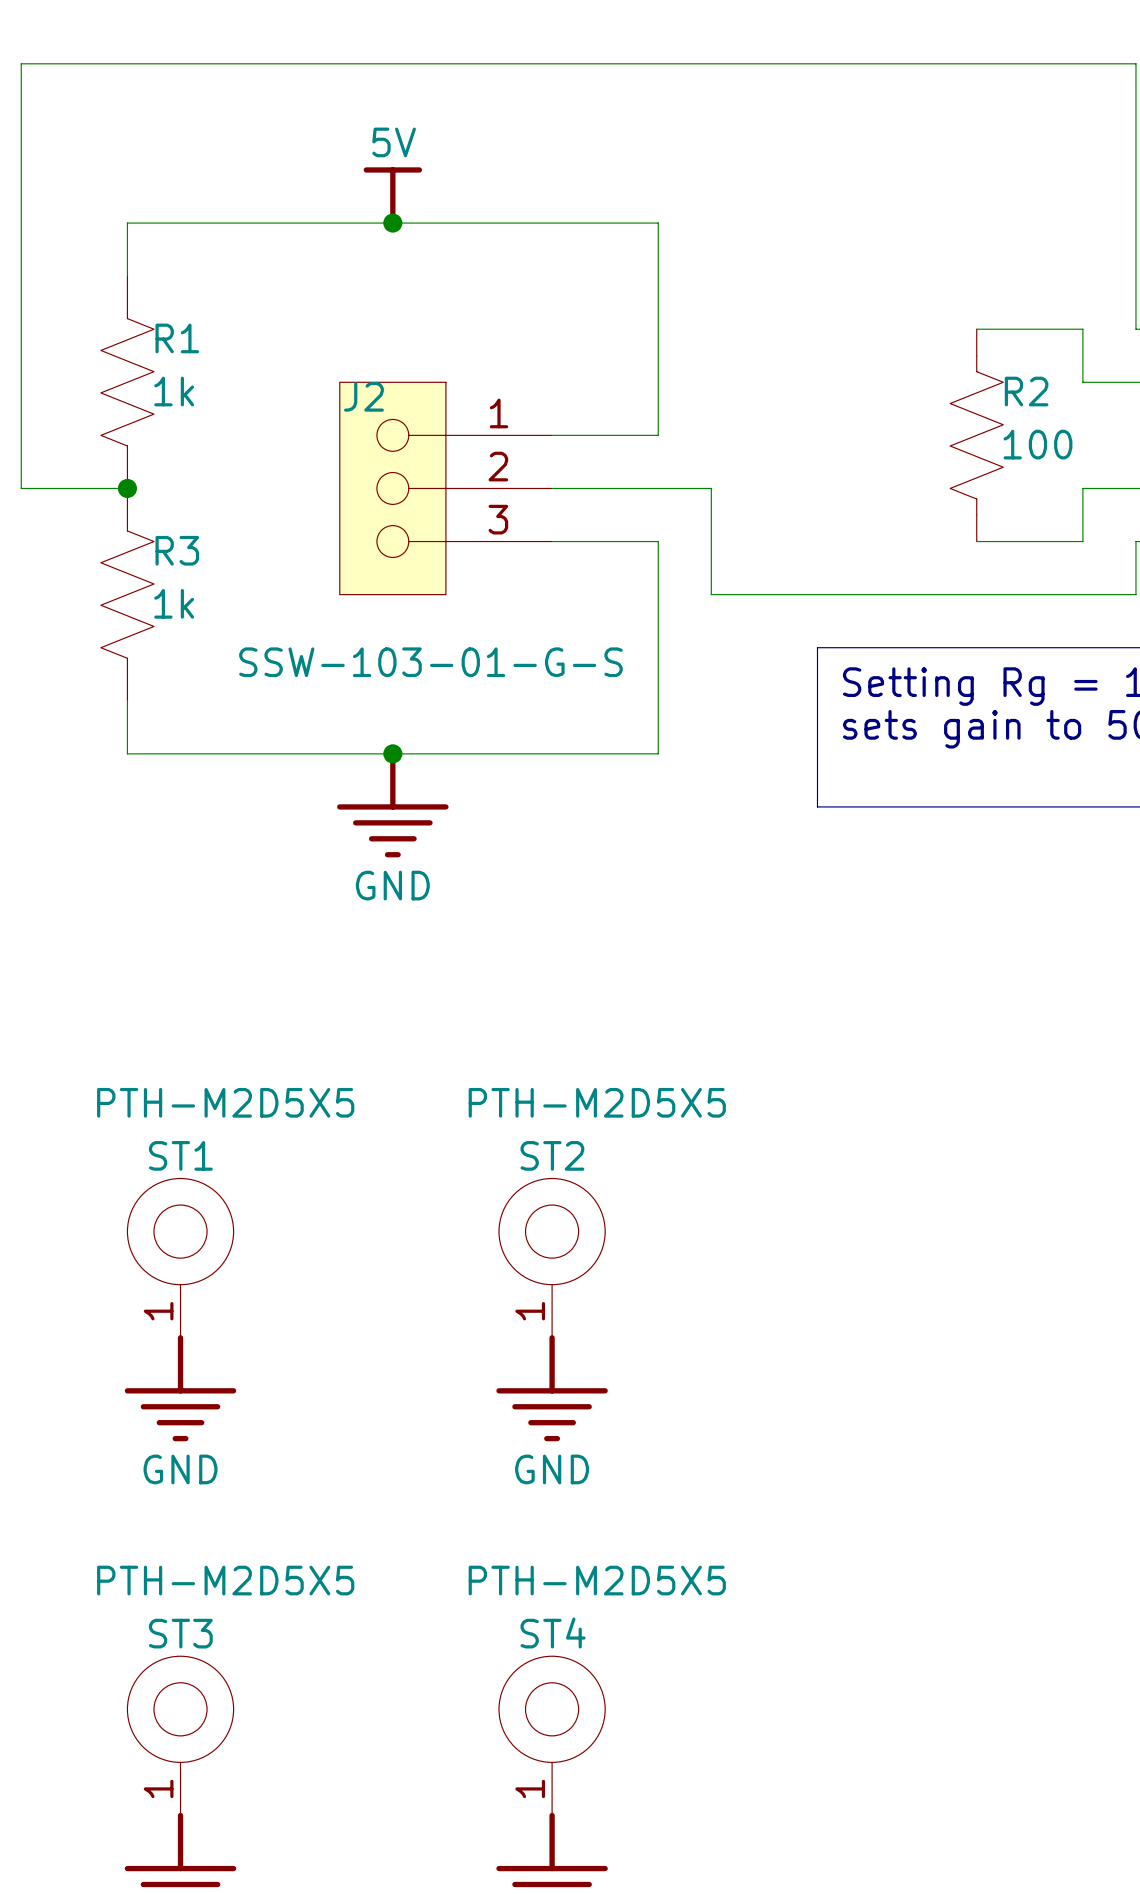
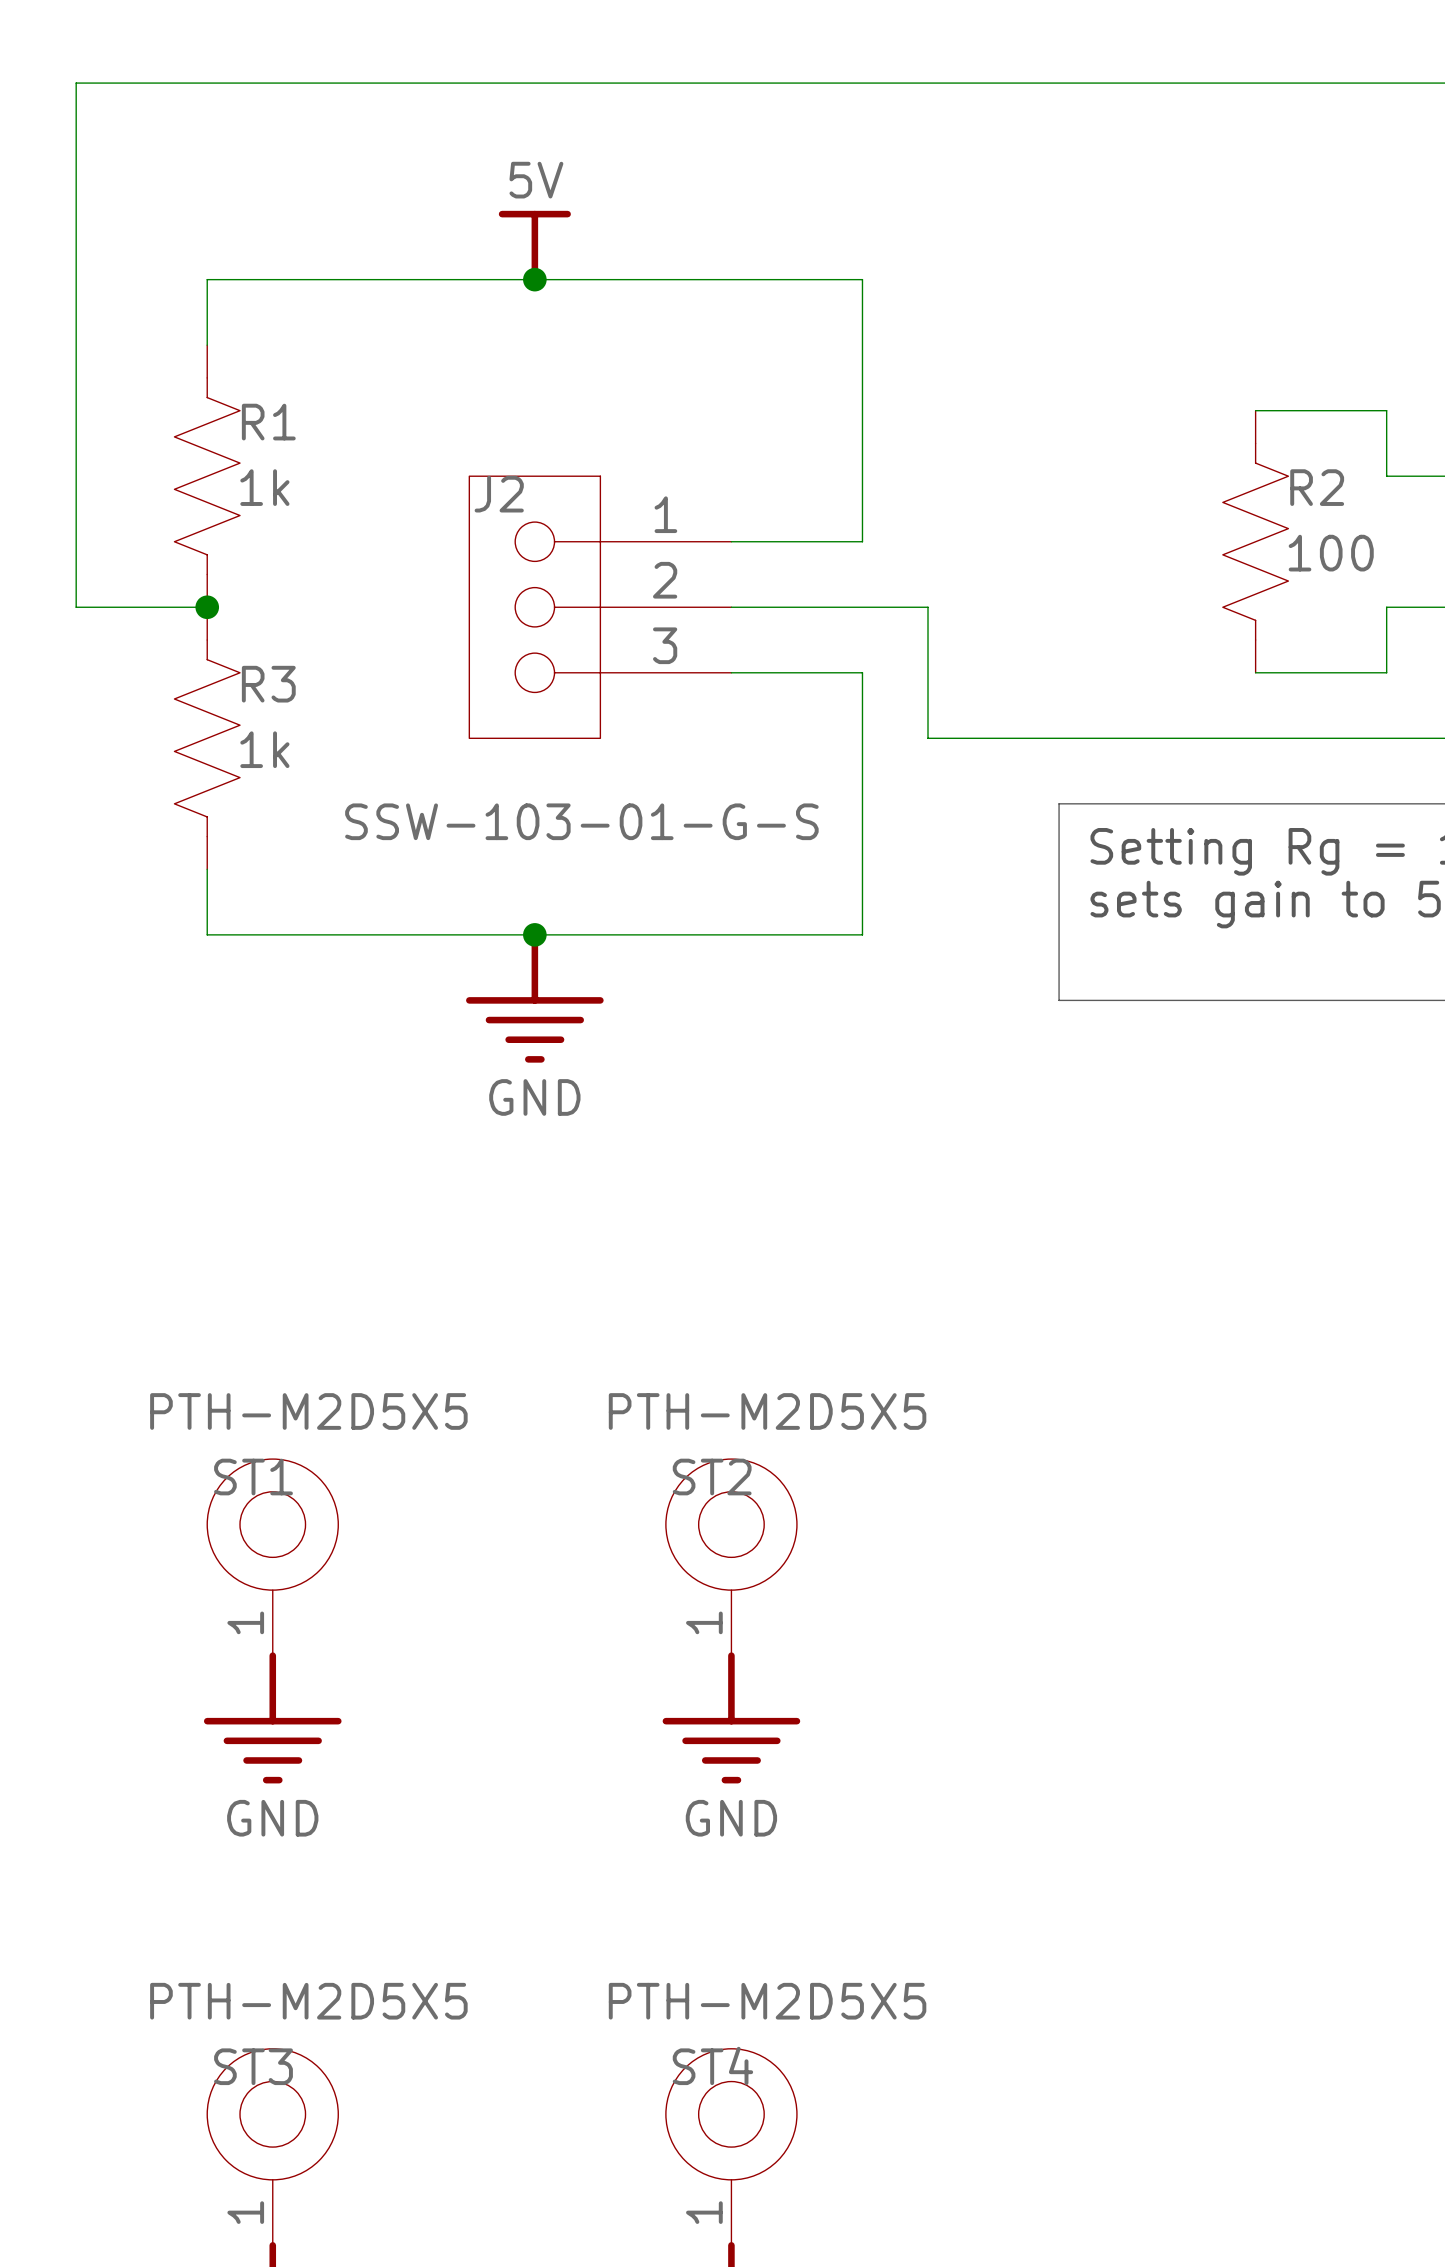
ST1 value position: PTH-M2D5X5 (225, 1102) -> PTH-M2D5X5 (308, 1411)
ST2 value position: PTH-M2D5X5 (597, 1102) -> PTH-M2D5X5 (767, 1411)
ST1 name position: ST1 (180, 1155) -> ST1 (253, 1477)
ST2 name position: ST2 (552, 1155) -> ST2 (712, 1477)
ST3 value position: PTH-M2D5X5 (225, 1580) -> PTH-M2D5X5 (308, 2001)
ST4 value position: PTH-M2D5X5 (597, 1580) -> PTH-M2D5X5 (767, 2001)
ST4 name position: ST4 (553, 1632) -> ST4 (712, 2065)
ST3 name position: ST3 (180, 1633) -> ST3 (253, 2066)

